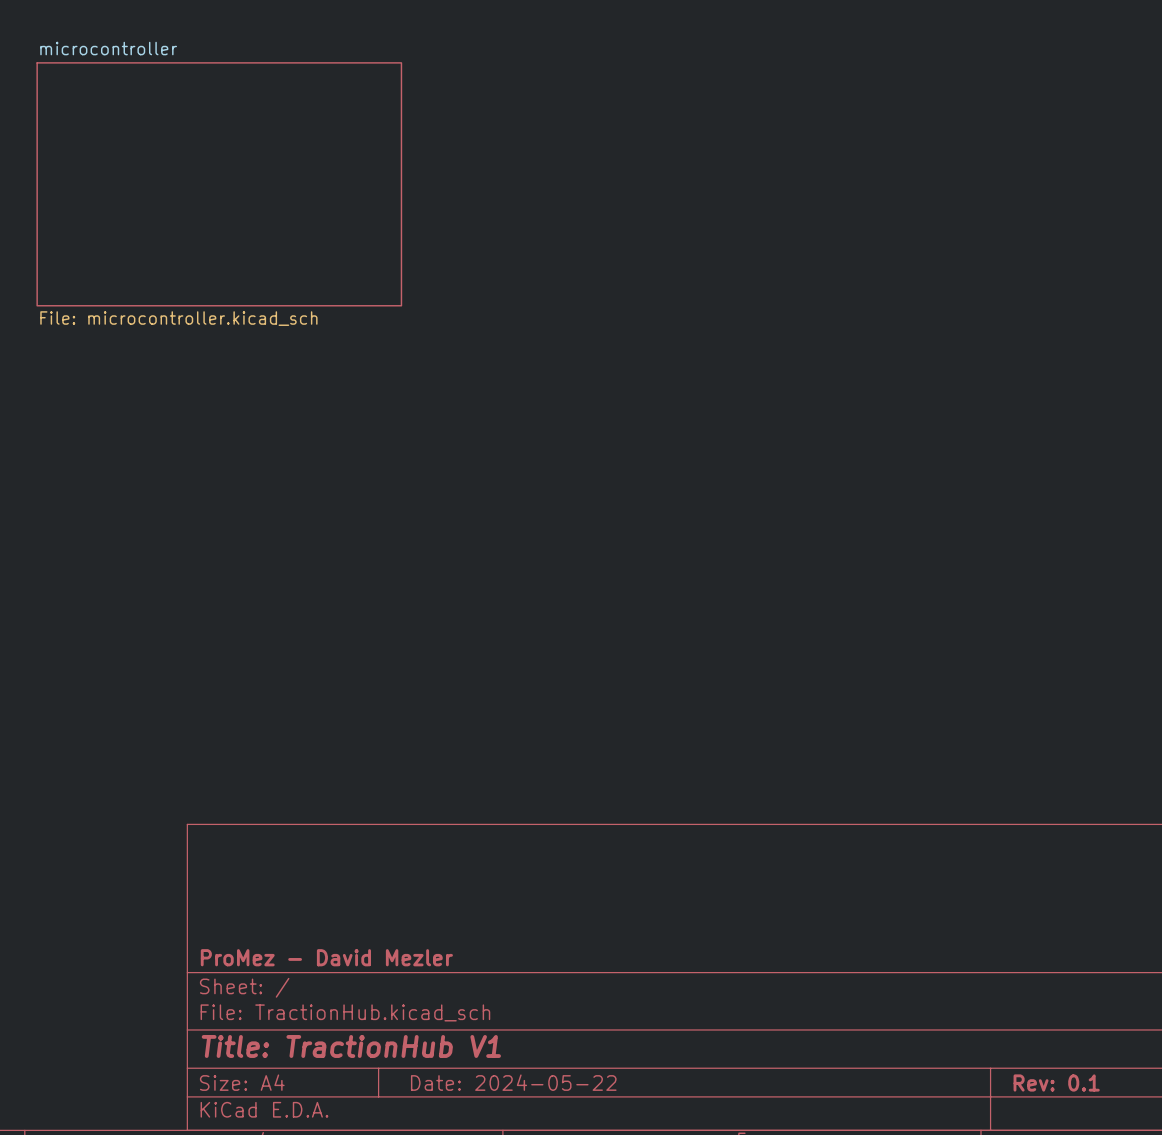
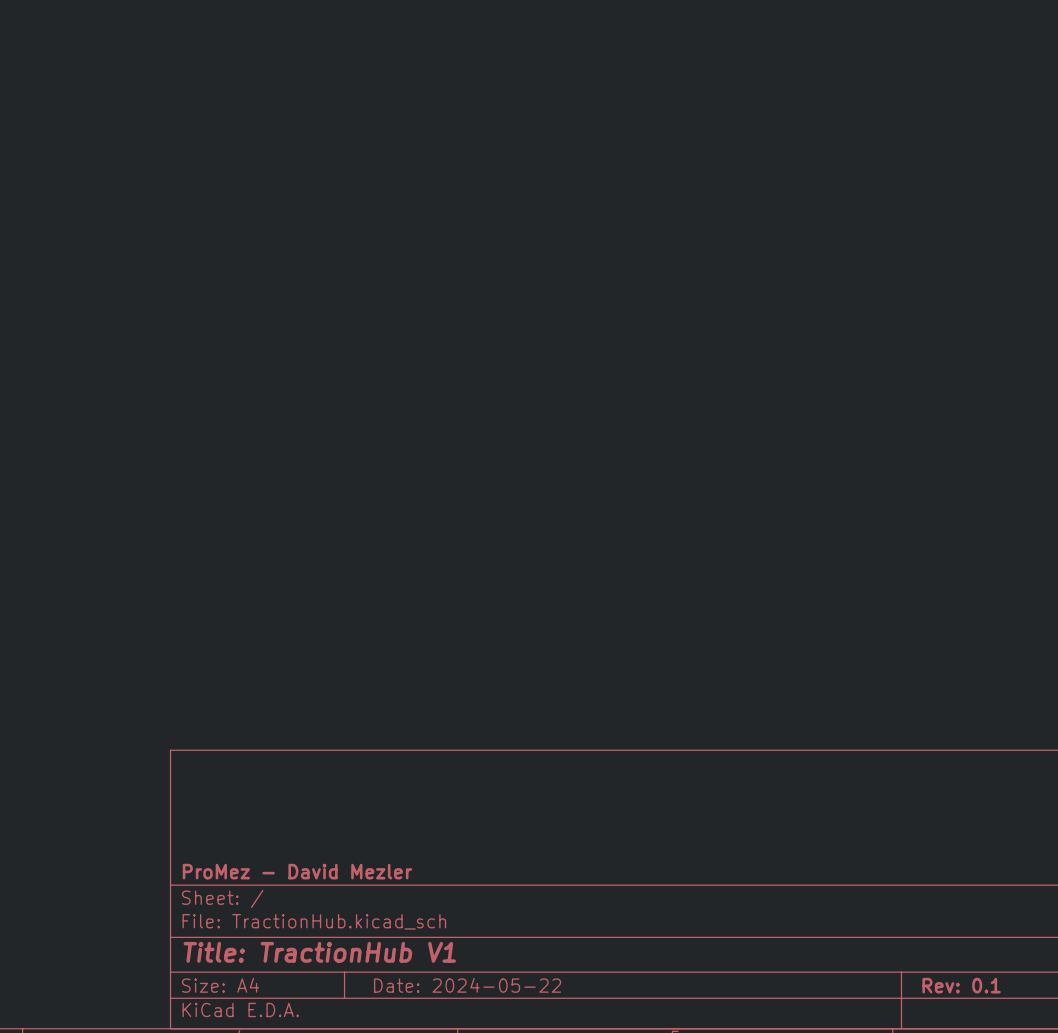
sheet microcontroller: File: microcontroller.kicad_sch (219, 184) -> none

